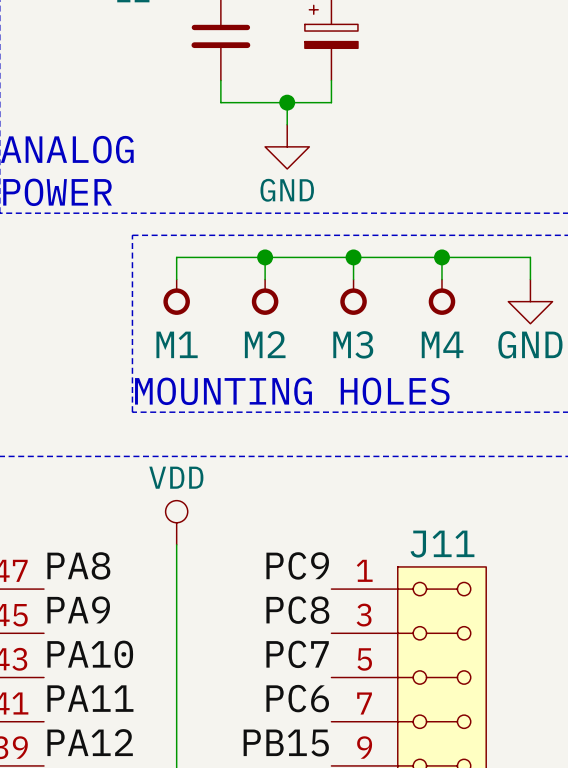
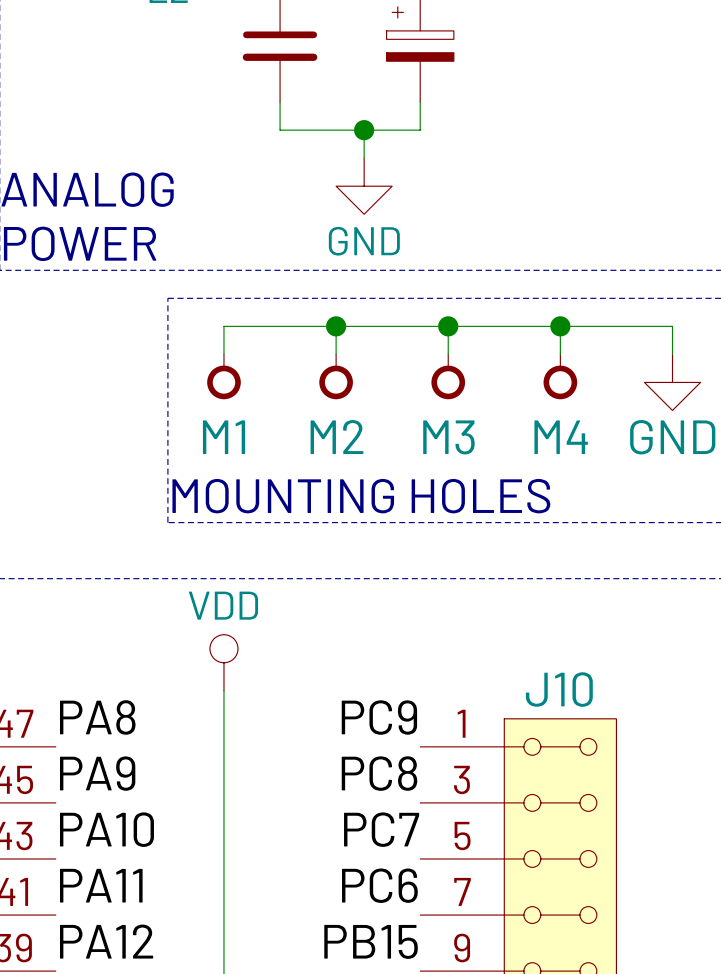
J11 name: J11 (442, 544) -> J10 (559, 689)

